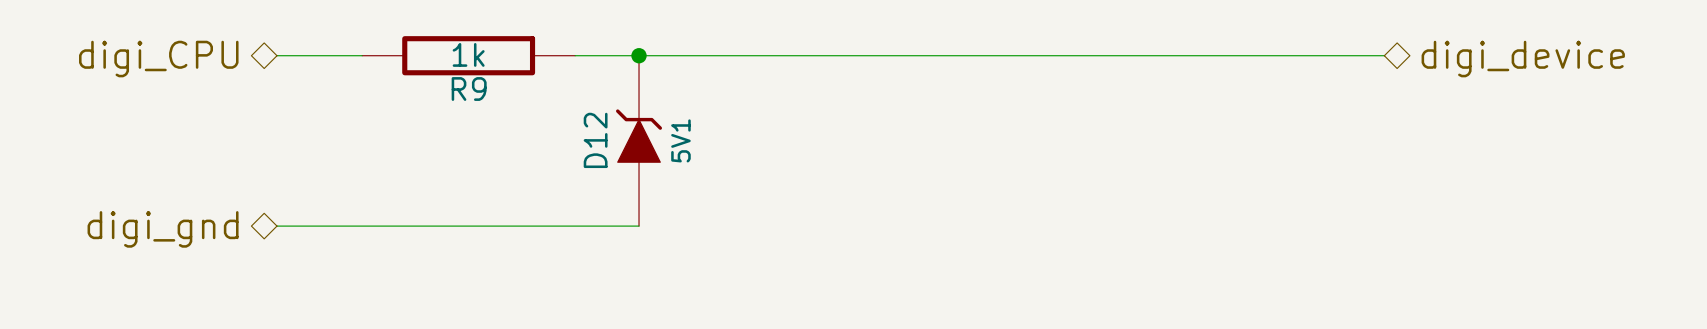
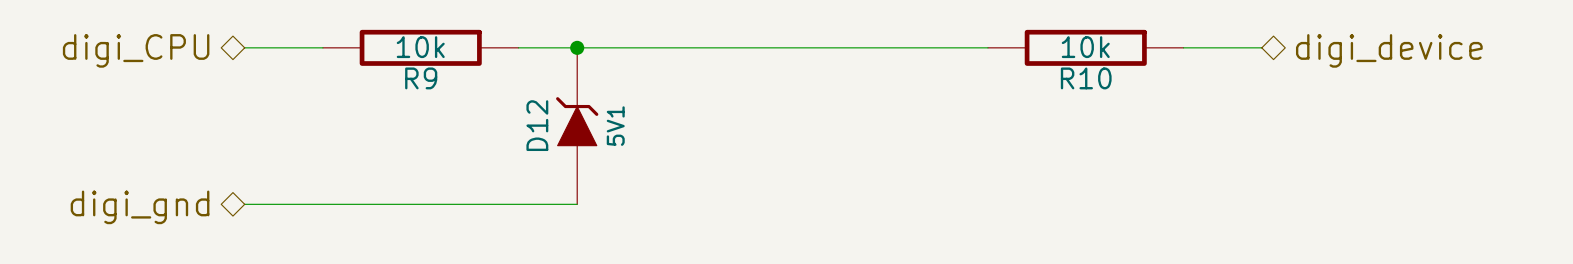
R9 value: 1k (468, 54) -> 10k (420, 47)
wire: (1086, 55) (1299, 55) -> none
R10: none -> 10k (1085, 47)

